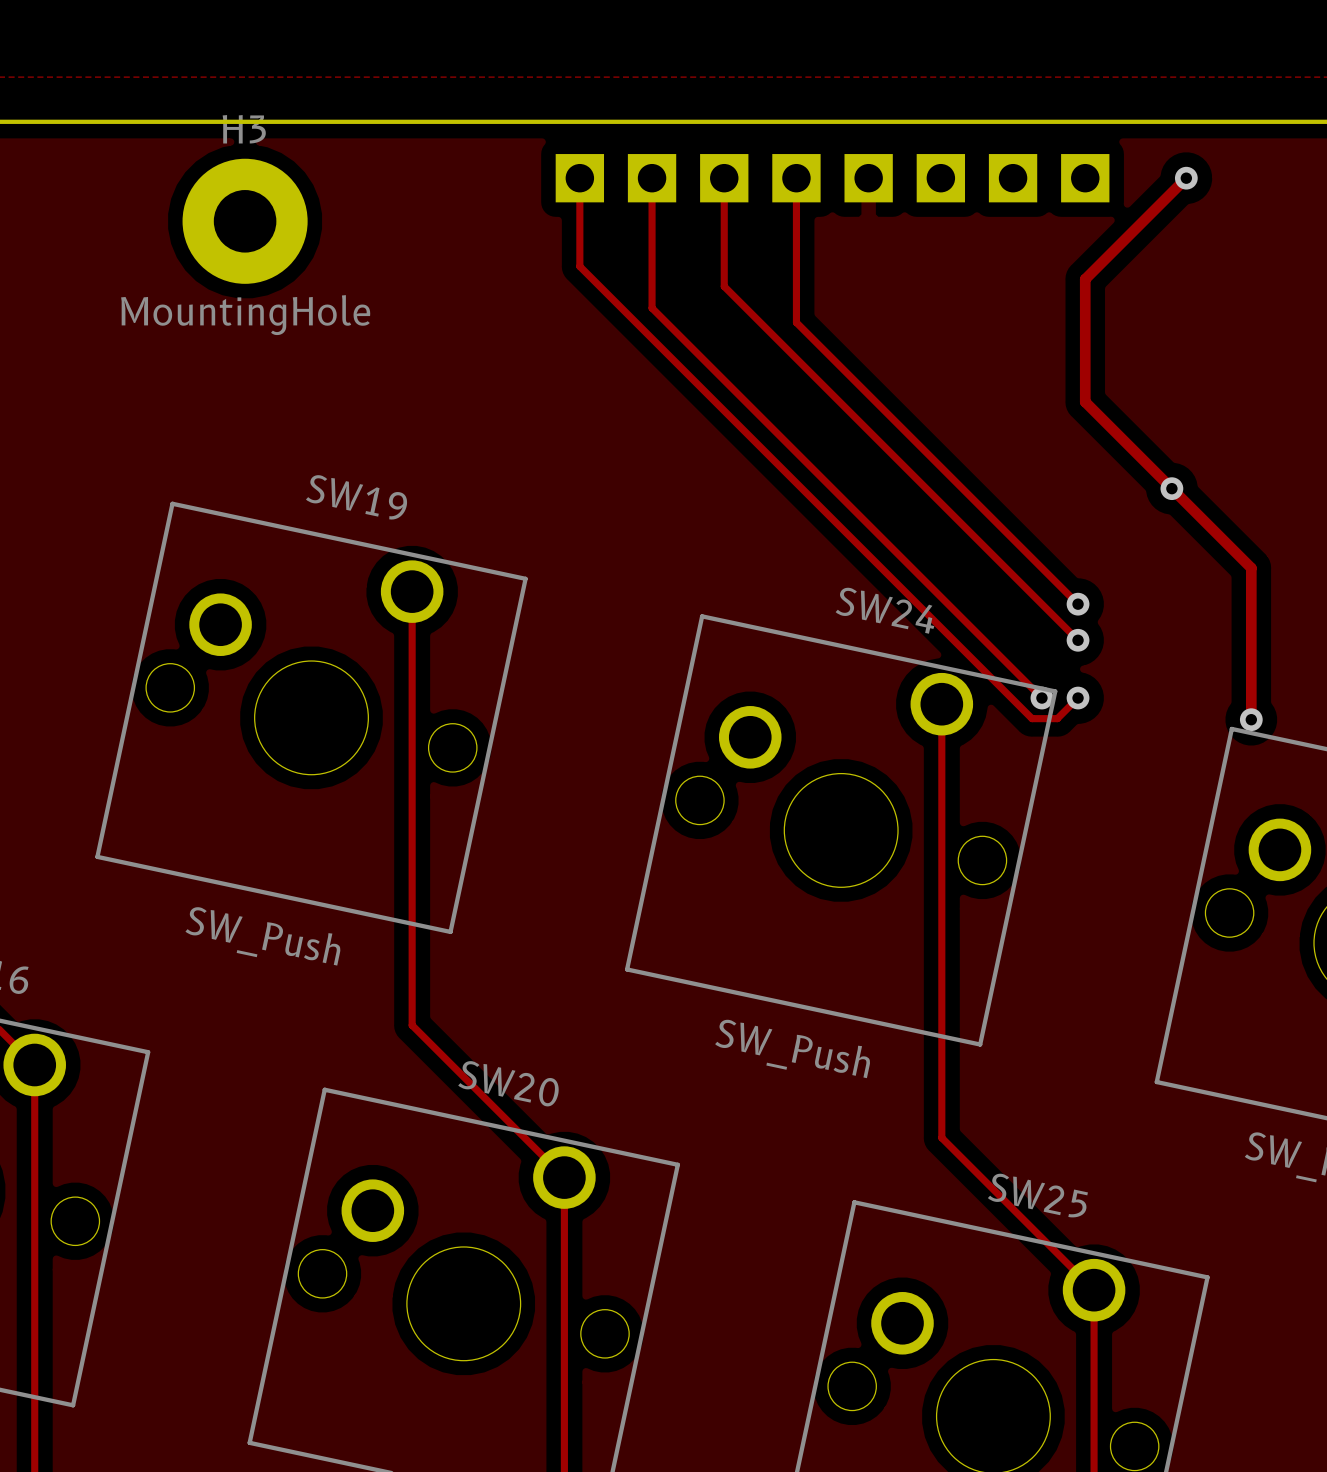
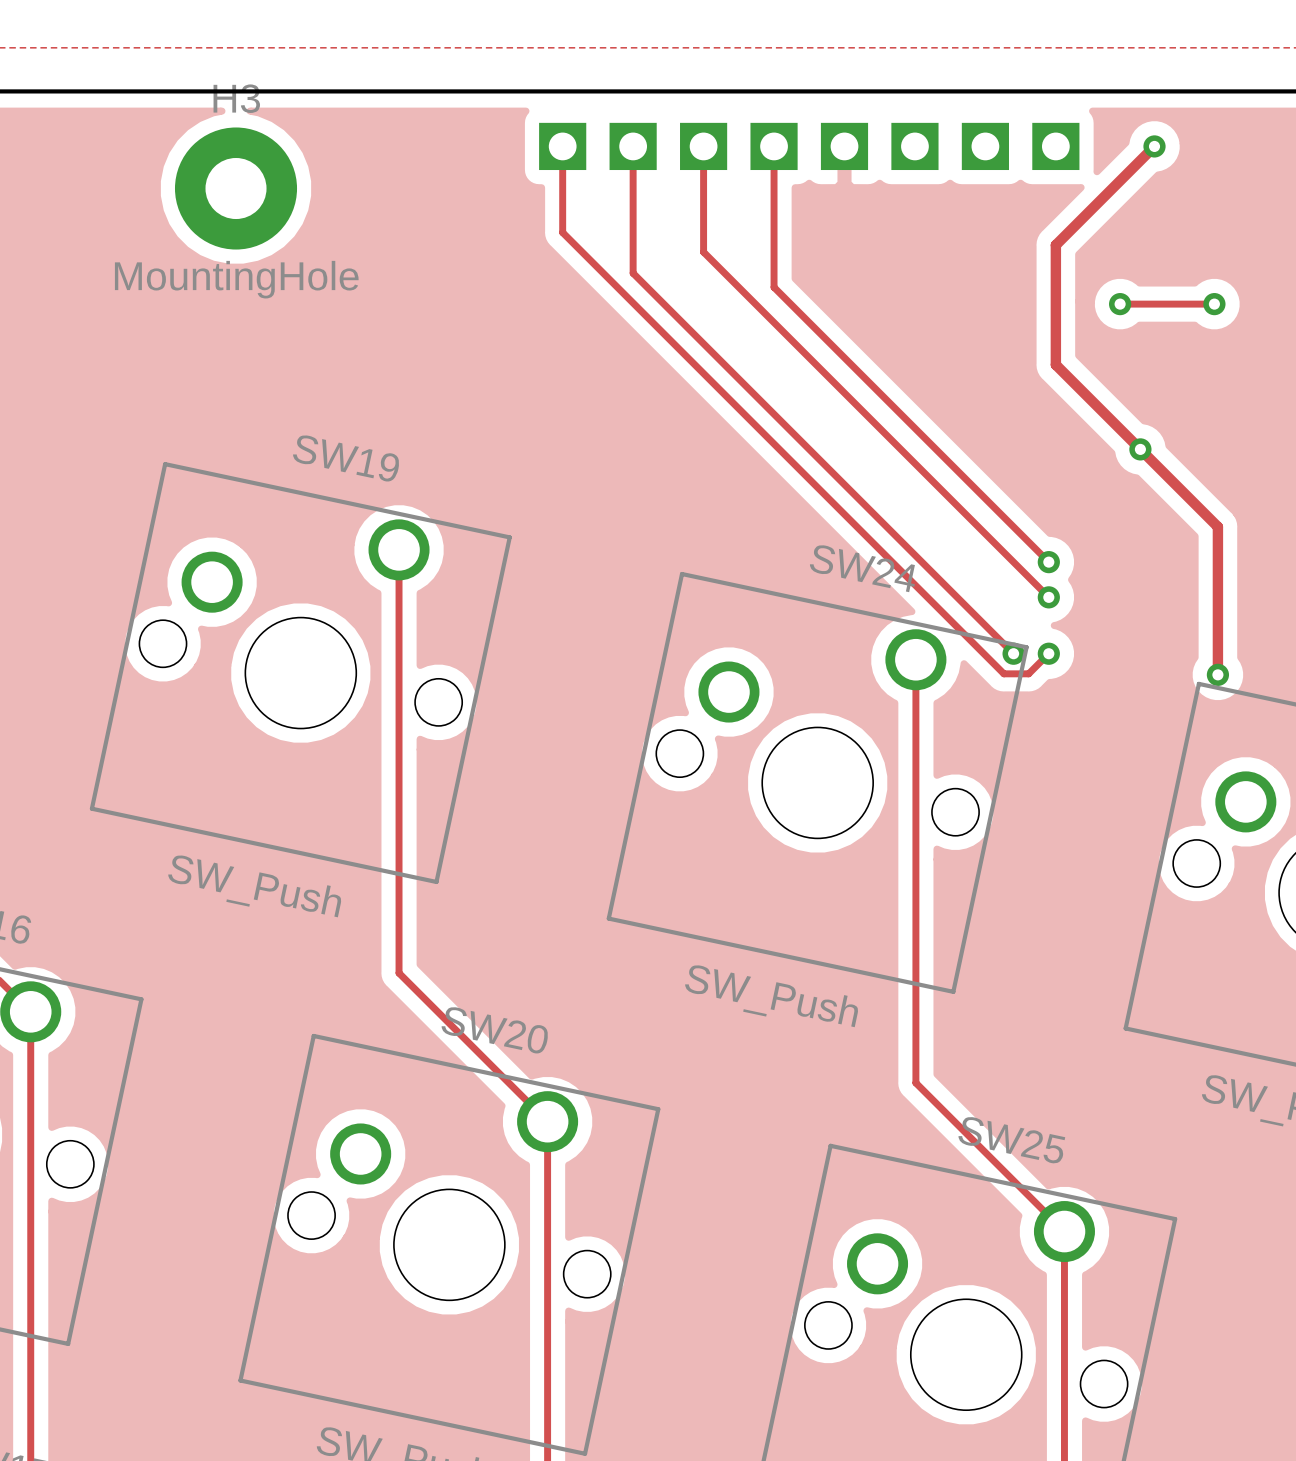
track: none -> (1120, 304) (1214, 304)
via: none -> (1120, 304)
via: none -> (1214, 304)

